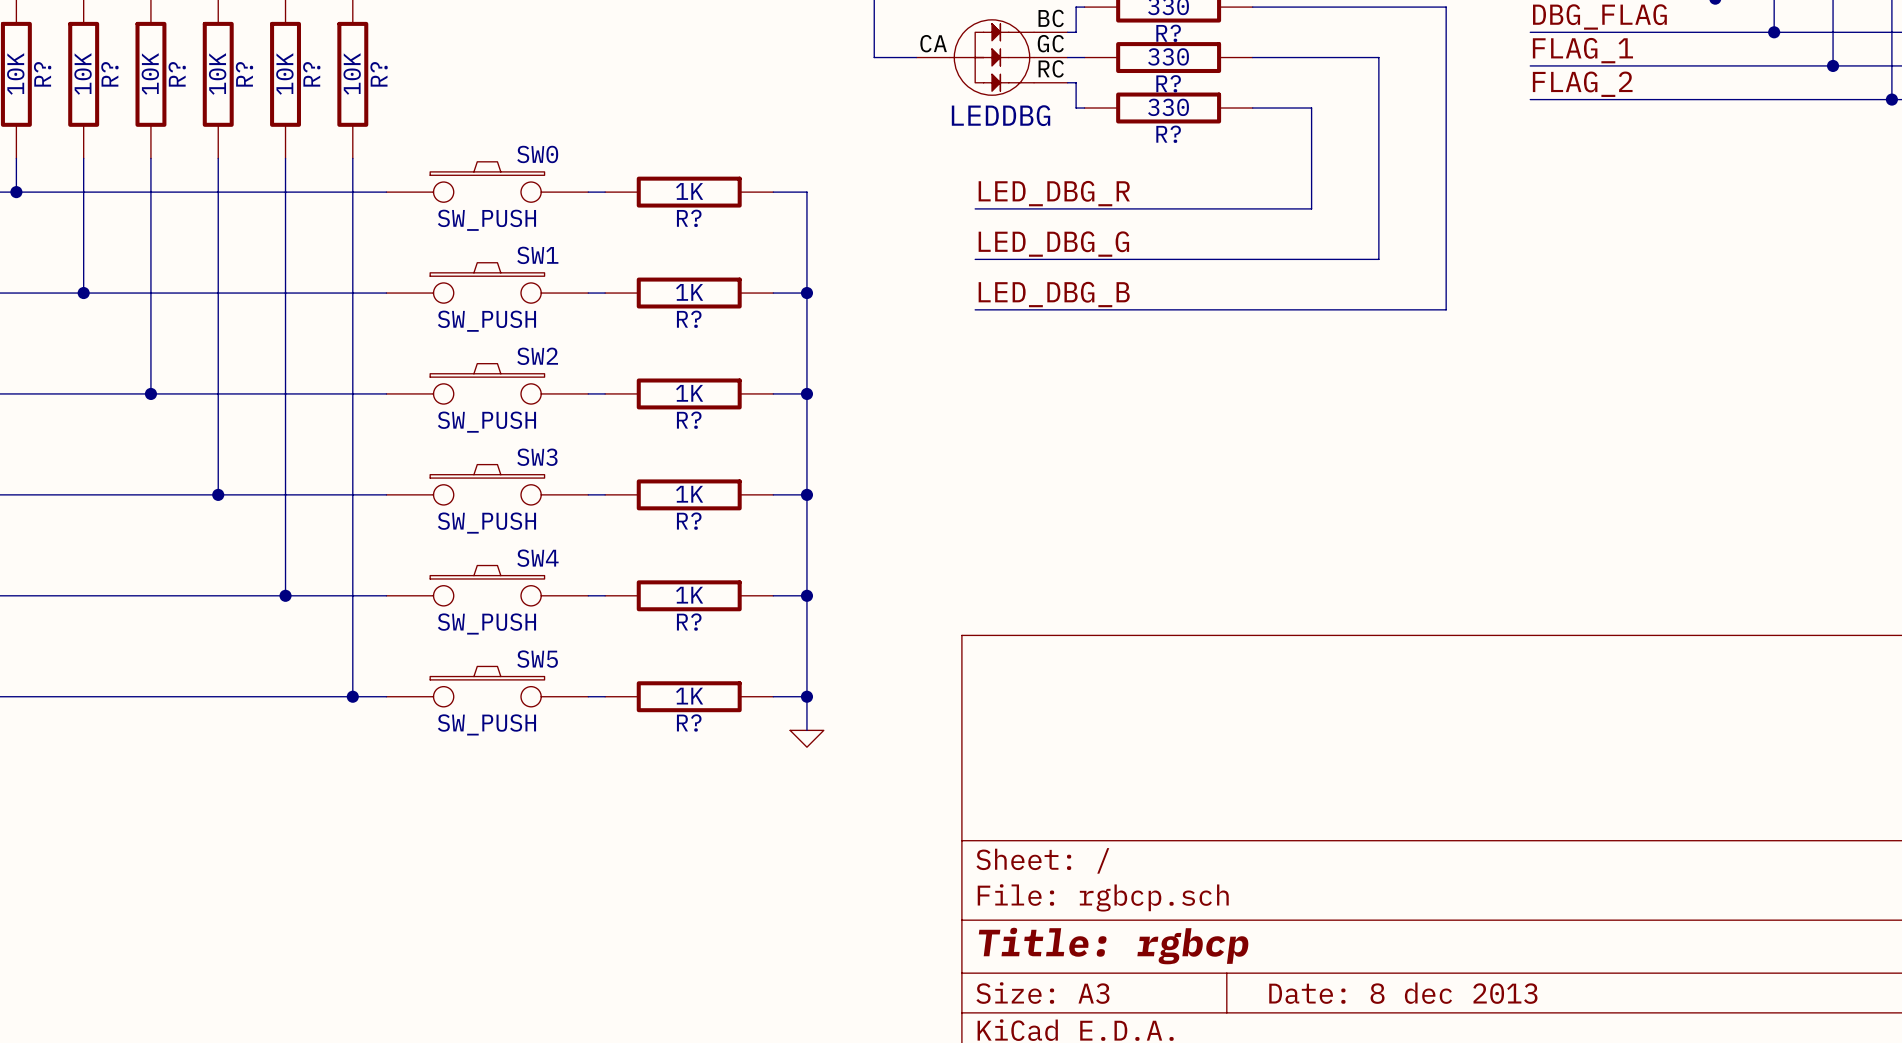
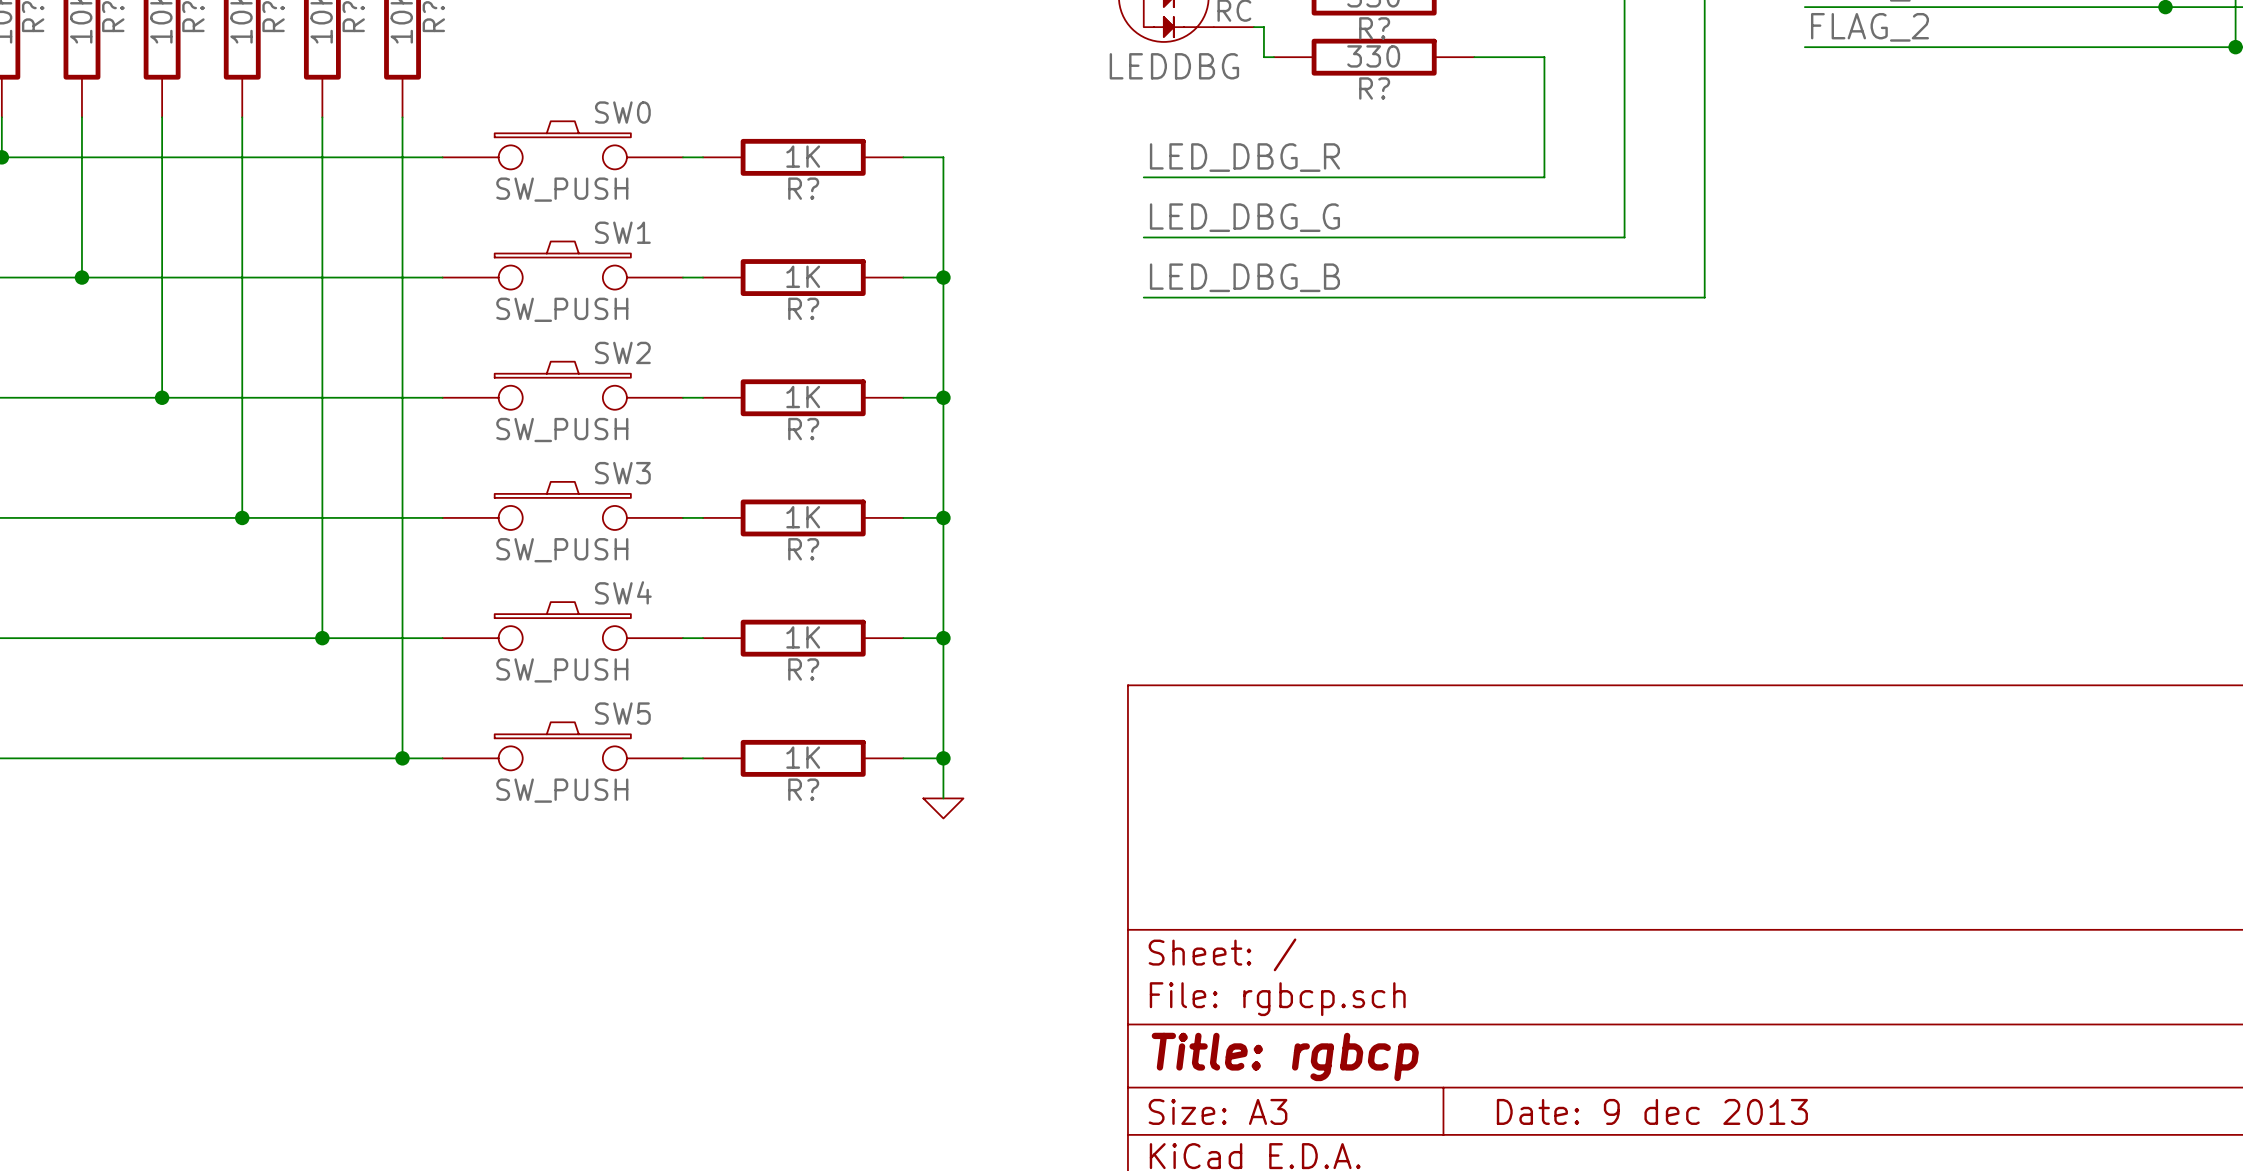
title block: Date: 8 dec 2013 (1403, 993) -> Date: 9 dec 2013 (1652, 1111)

